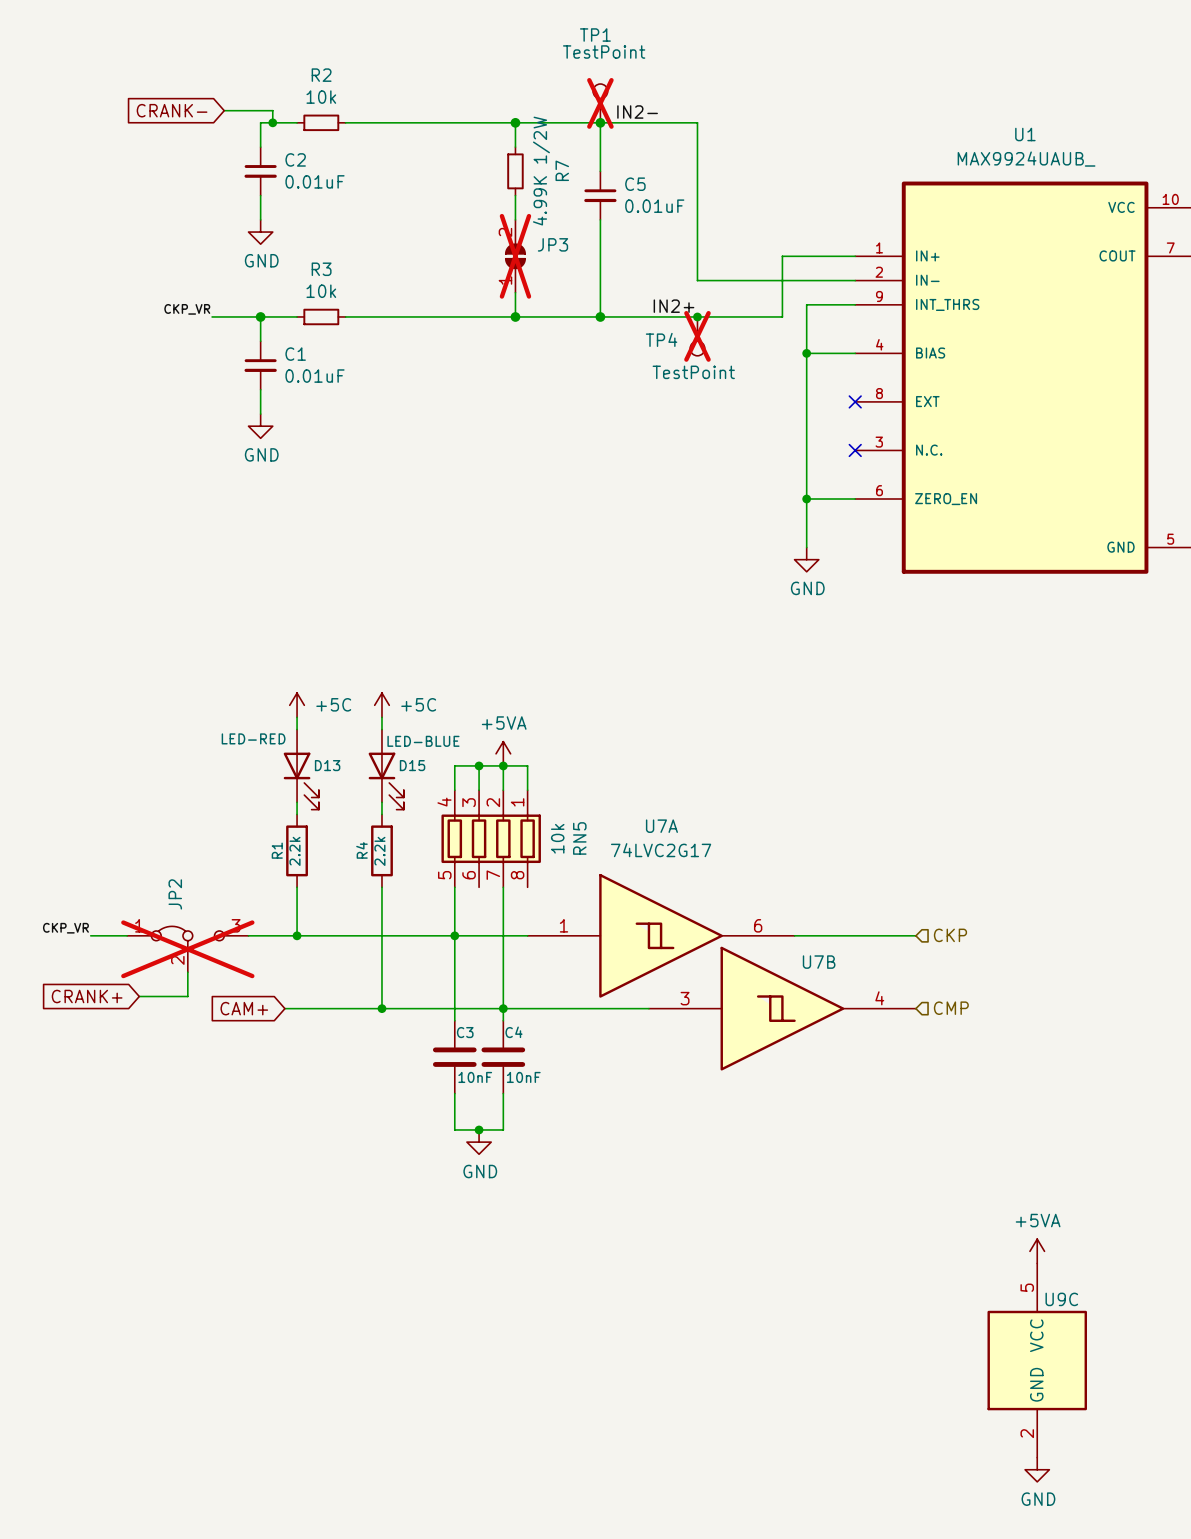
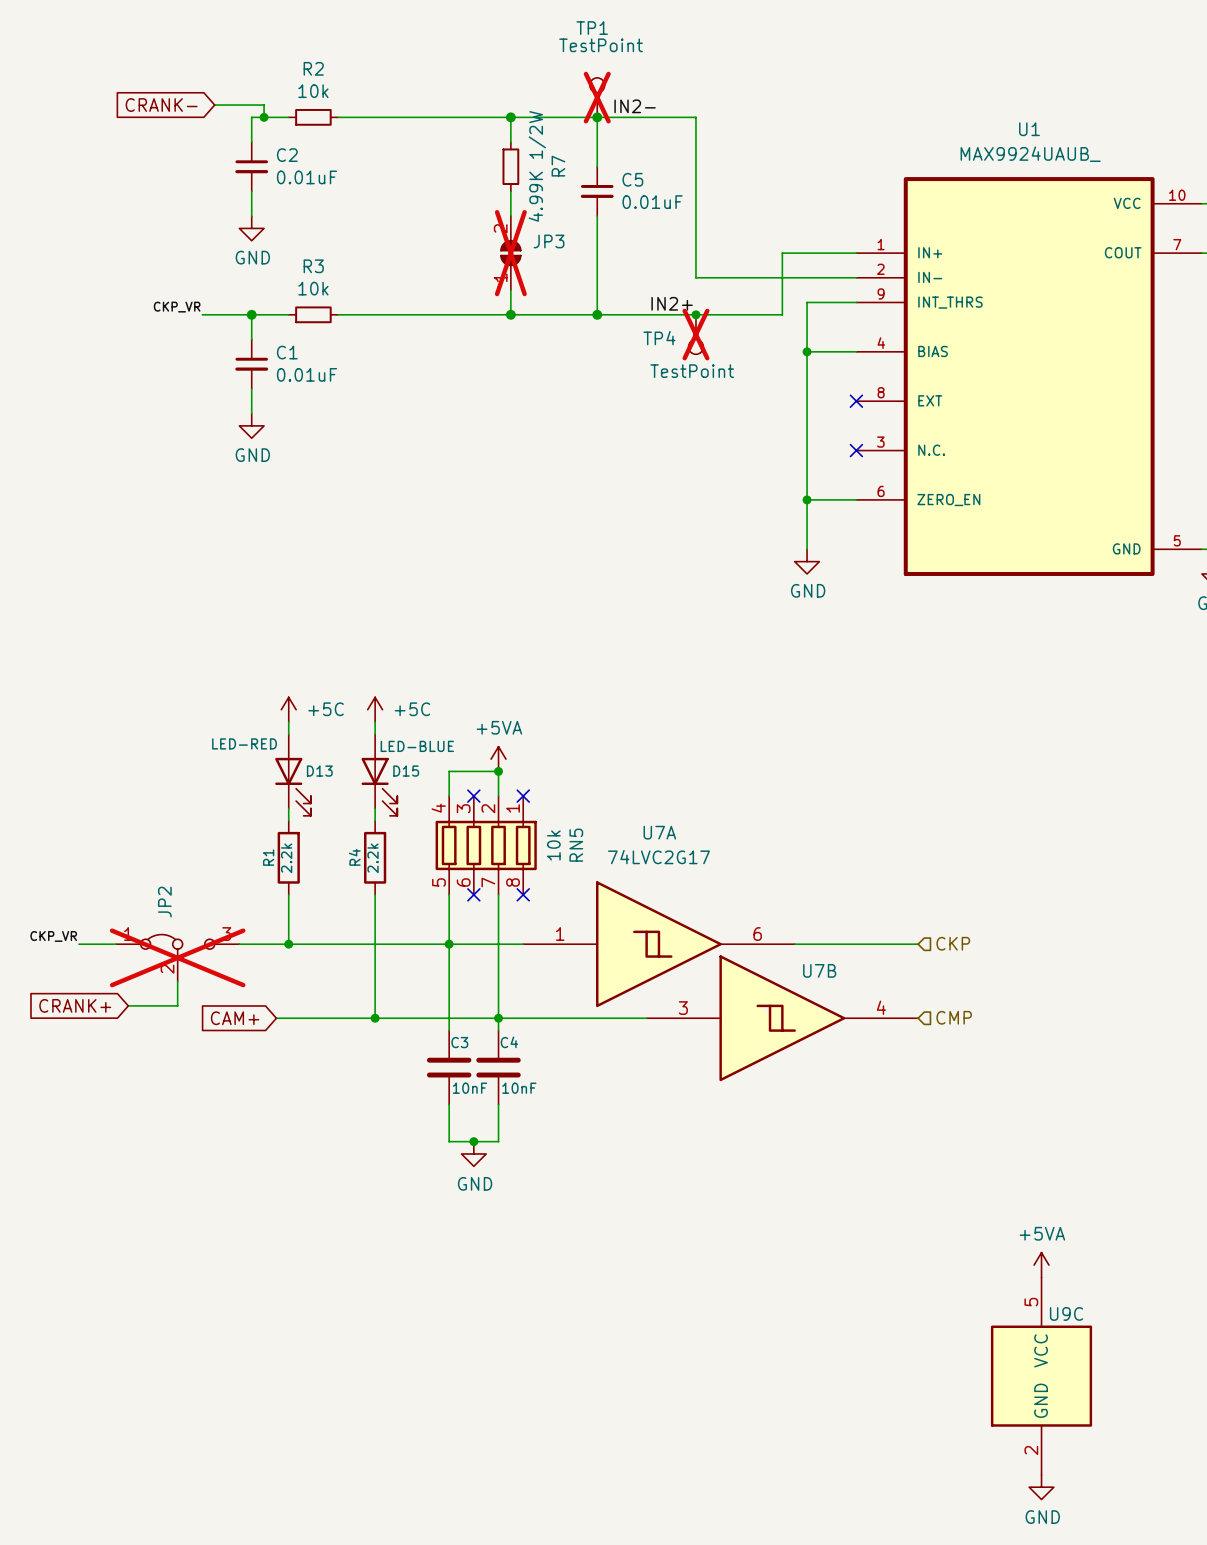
wire: (479, 765) (479, 790) -> none
junction: (479, 765) -> none
wire: (503, 765) (527, 765) (527, 790) -> none
no-connect mark: none -> (473, 796)
no-connect mark: none -> (523, 796)
no-connect mark: none -> (473, 894)
no-connect mark: none -> (523, 894)

